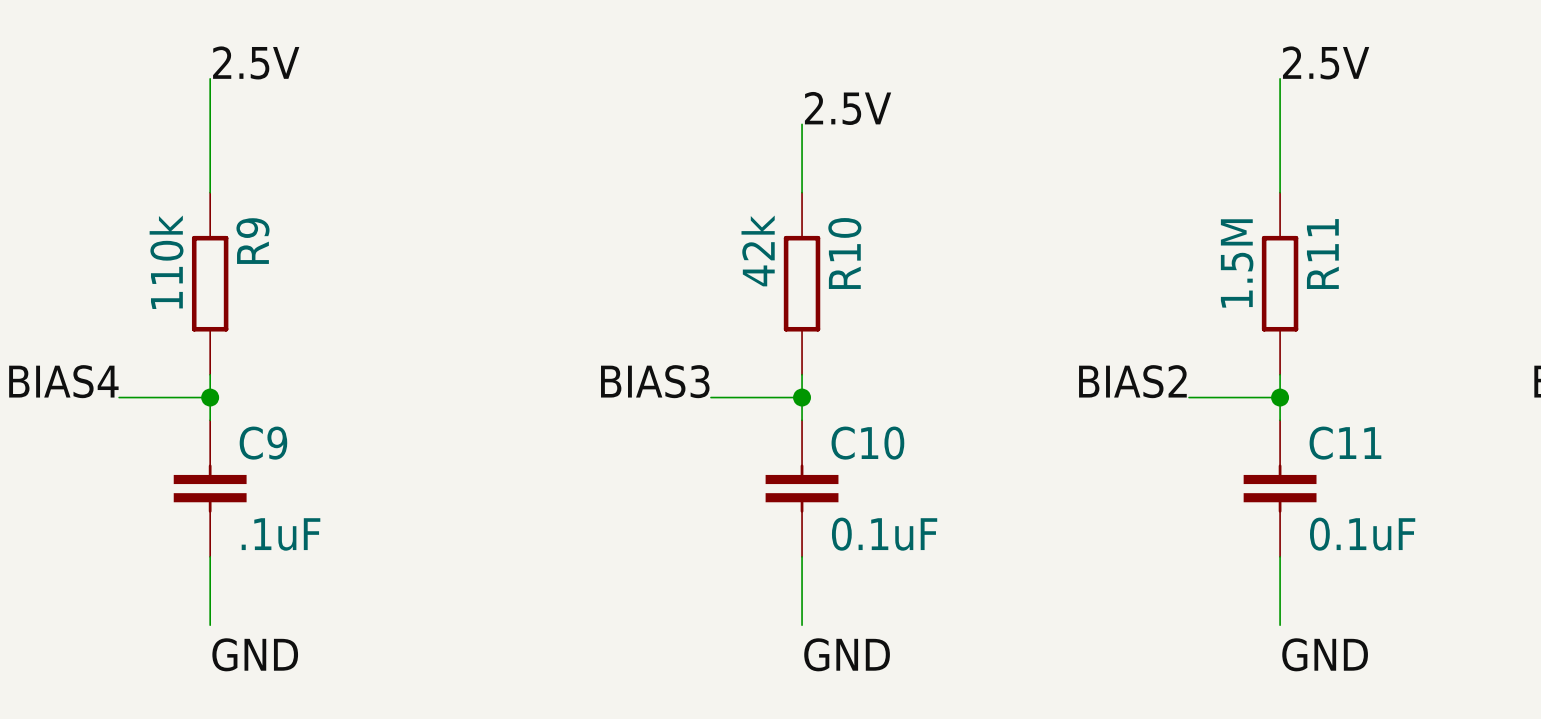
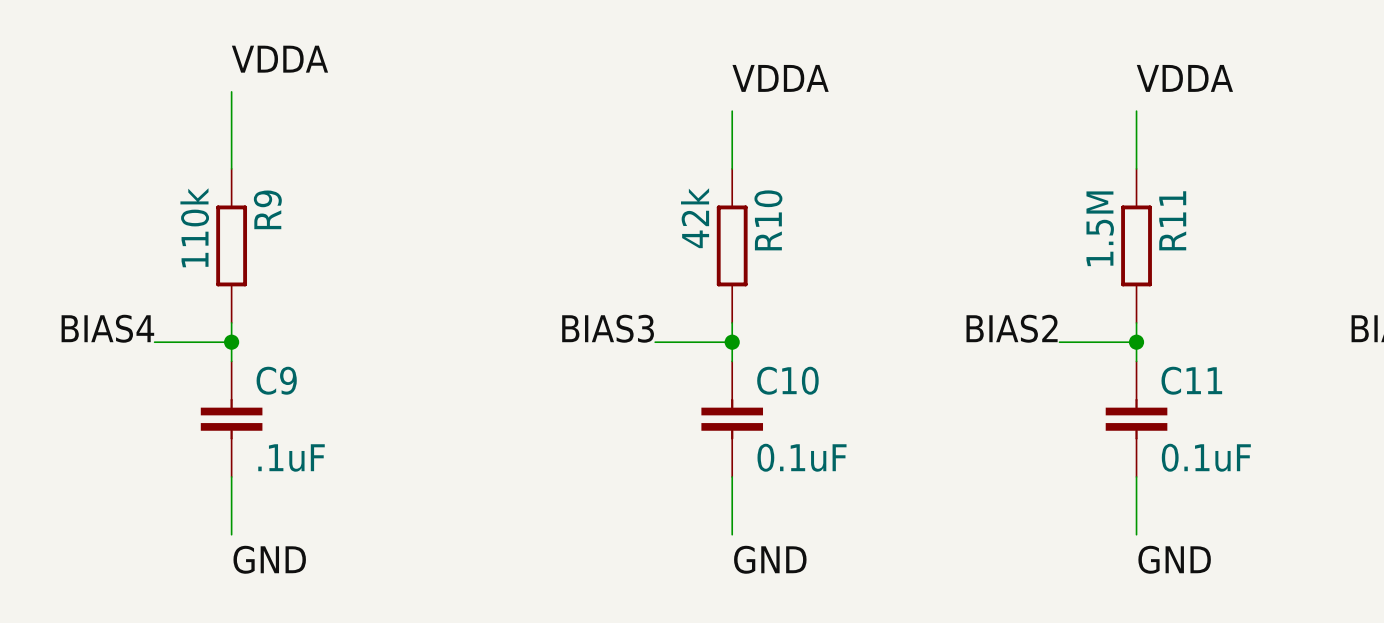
label: 2.5V (256, 62) -> VDDA (279, 59)
label: 2.5V (1326, 62) -> none
wire: (210, 78) (210, 101) -> none
wire: (1280, 78) (1280, 124) -> none
label: none -> VDDA (780, 78)
label: none -> VDDA (1184, 78)
label: 2.5V (848, 108) -> none

